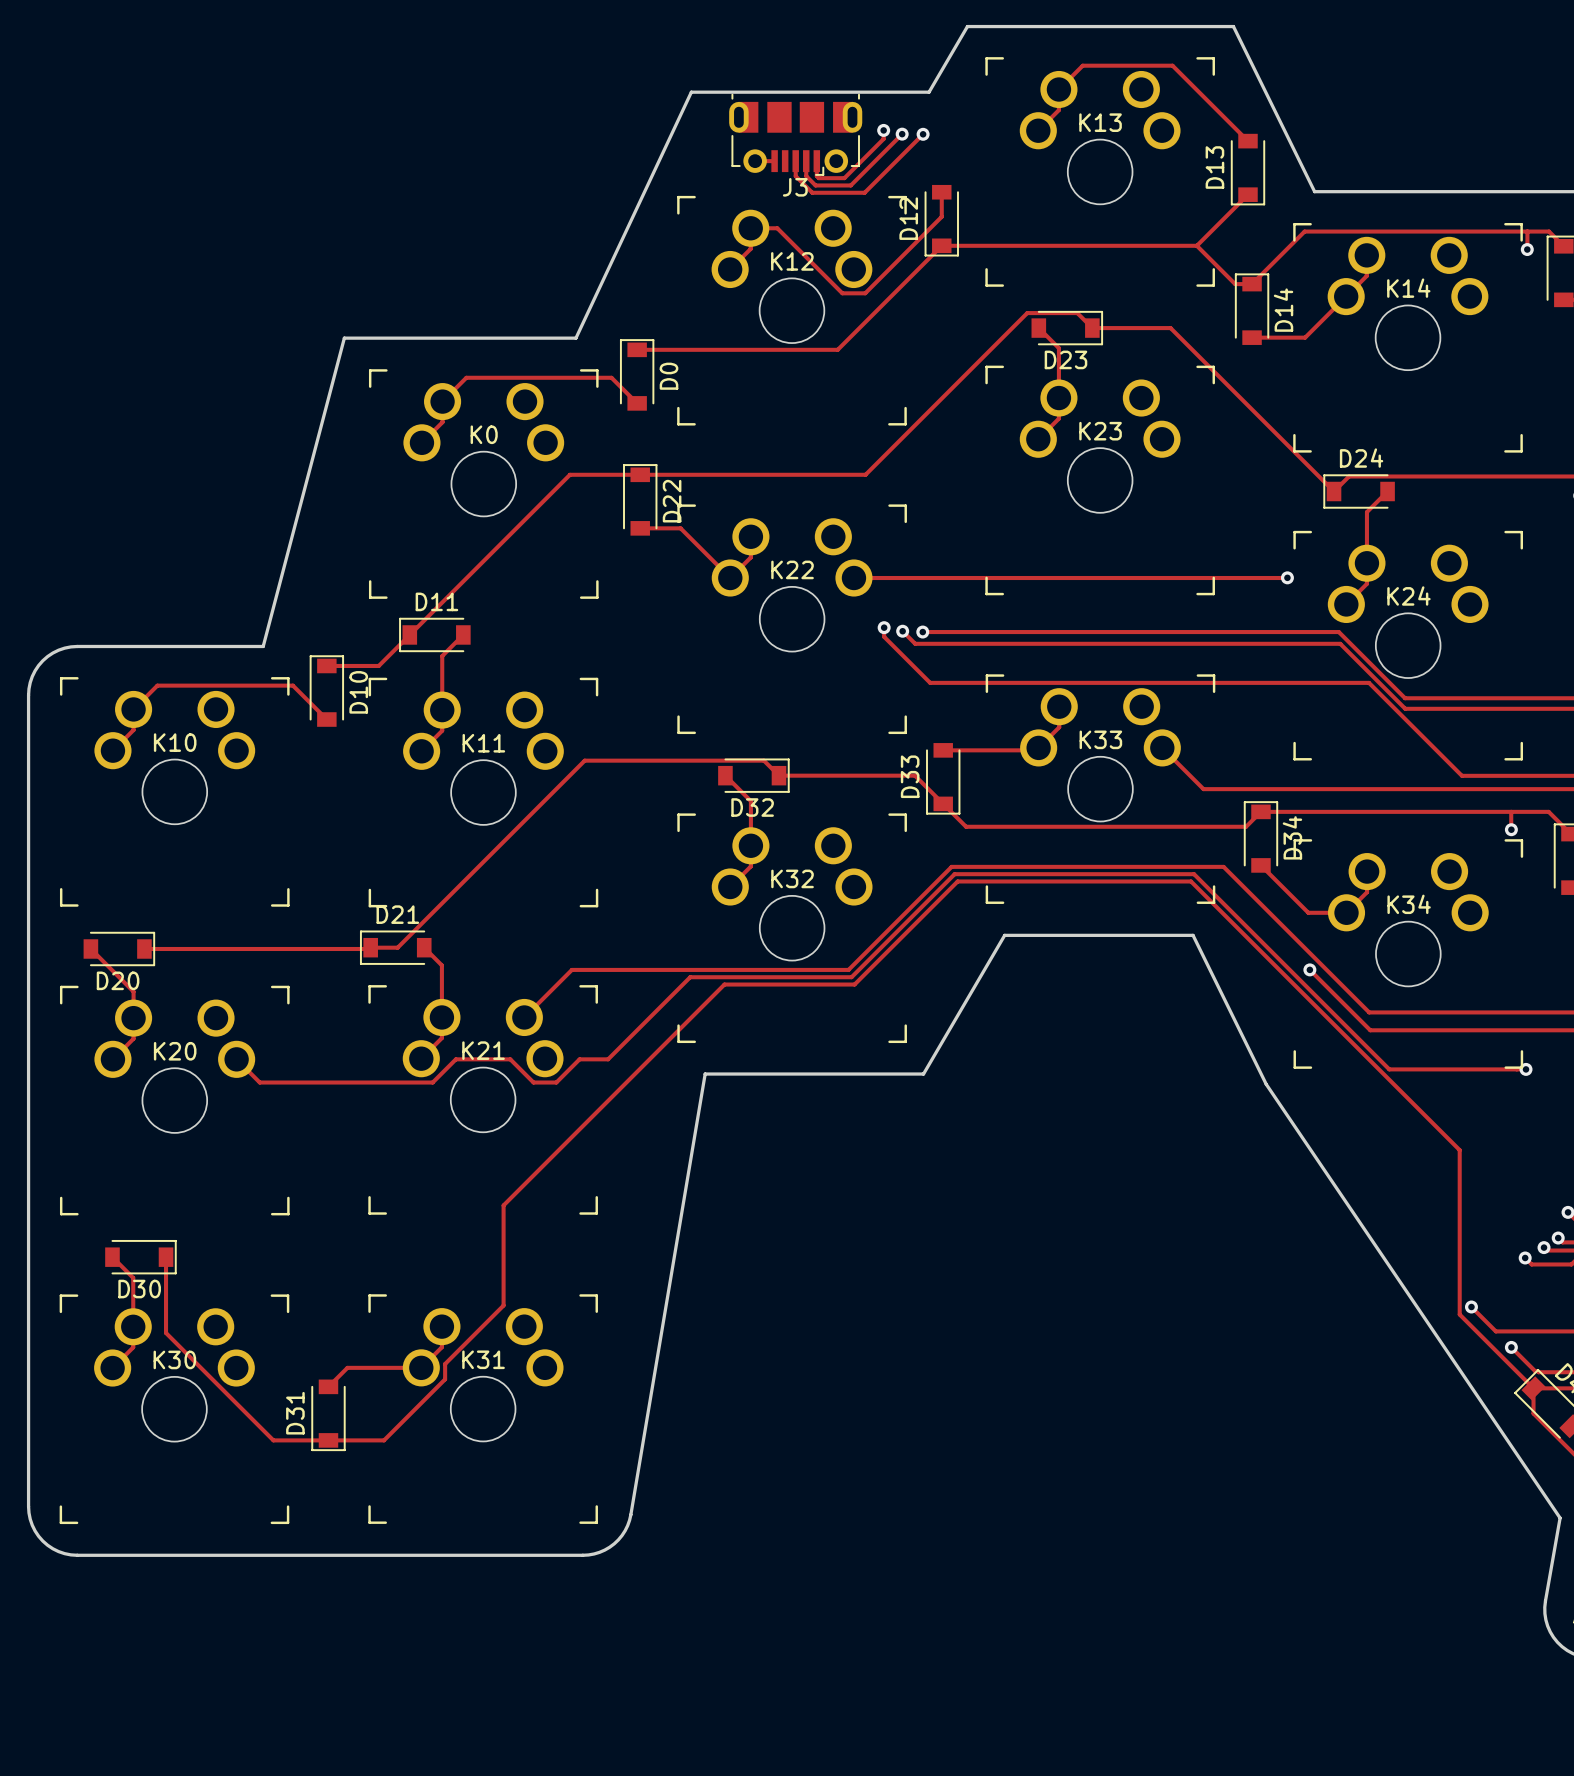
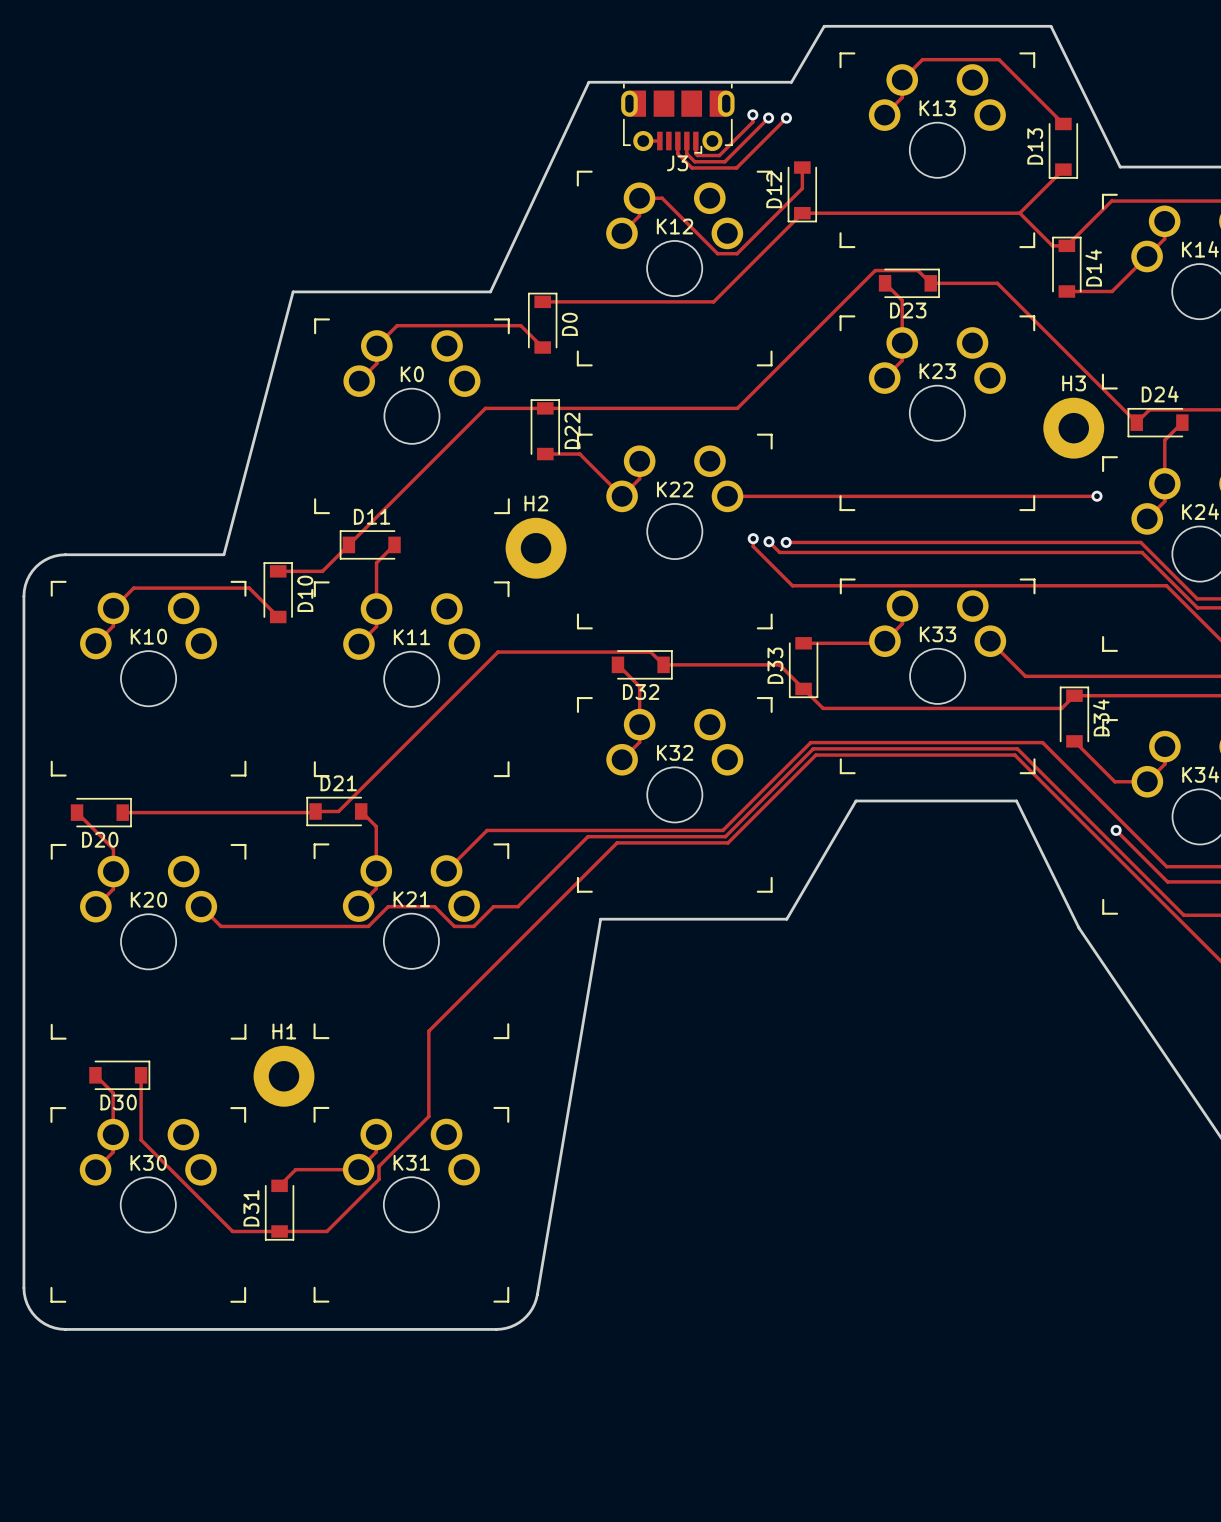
H3: none -> (1073, 428)
H2: none -> (536, 548)
H1: none -> (284, 1076)

